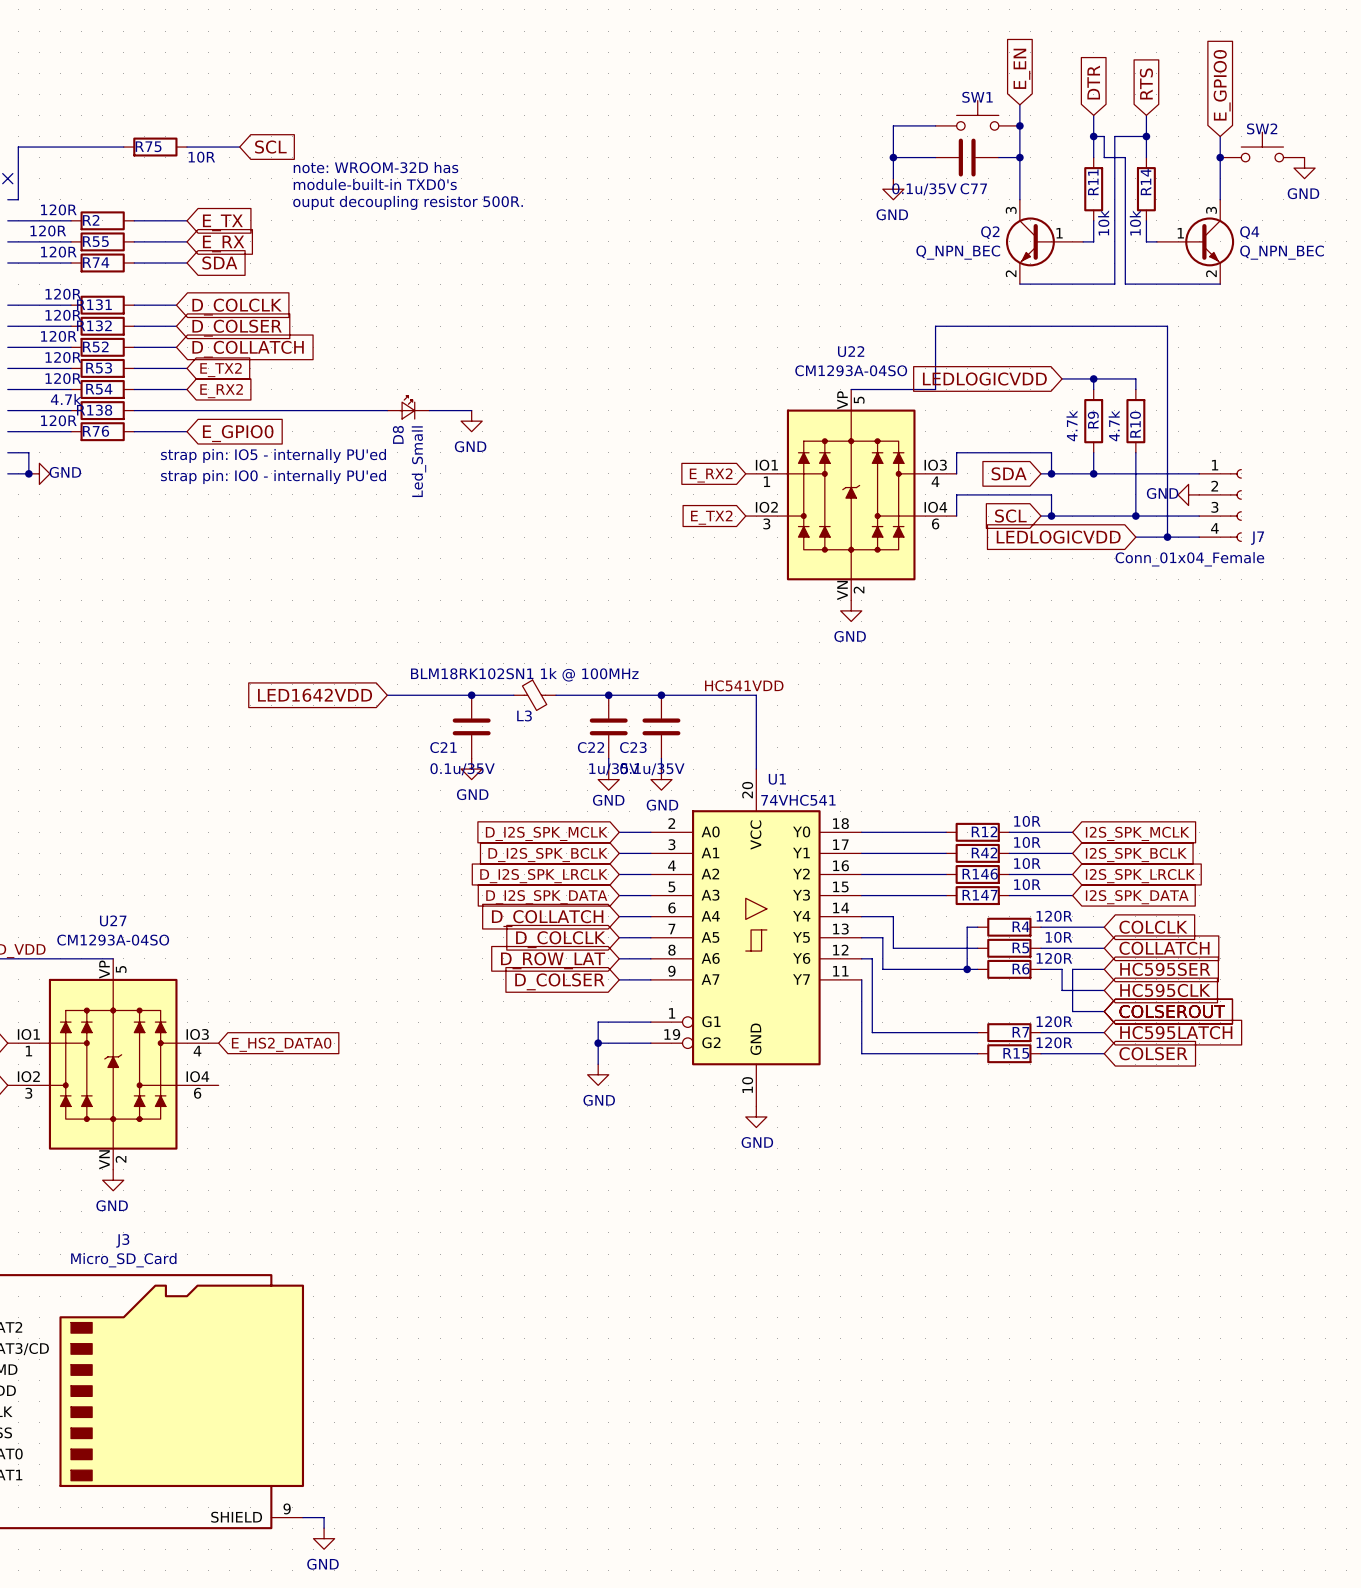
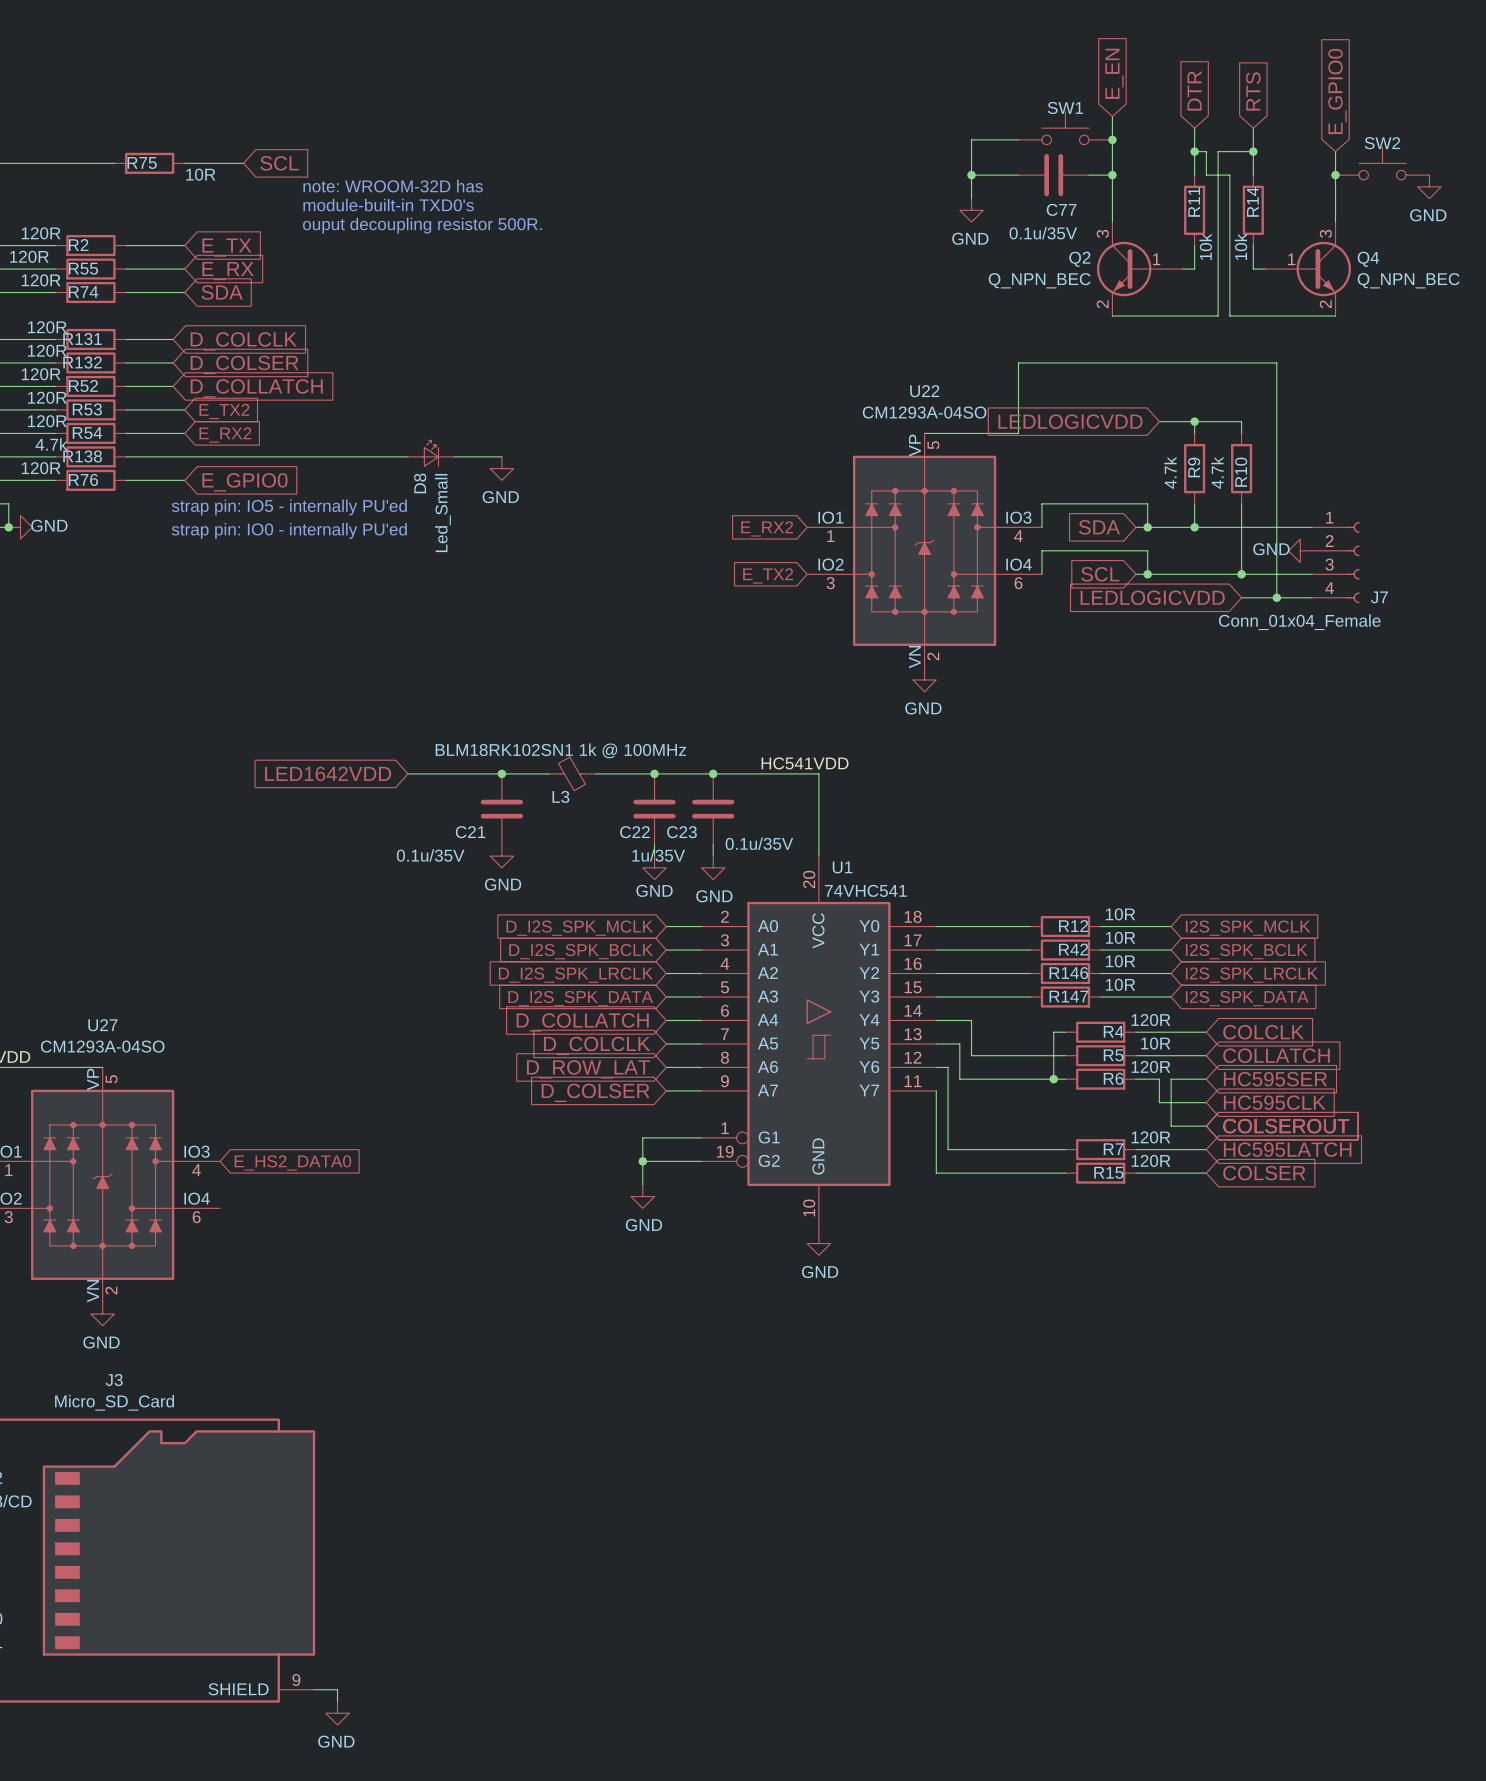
C77 value position: 0.1u/35V (924, 189) -> 0.1u/35V (1043, 233)
C21 value position: 0.1u/35V (462, 769) -> 0.1u/35V (430, 855)
C23 value position: 0.1u/35V (652, 769) -> 0.1u/35V (759, 843)

